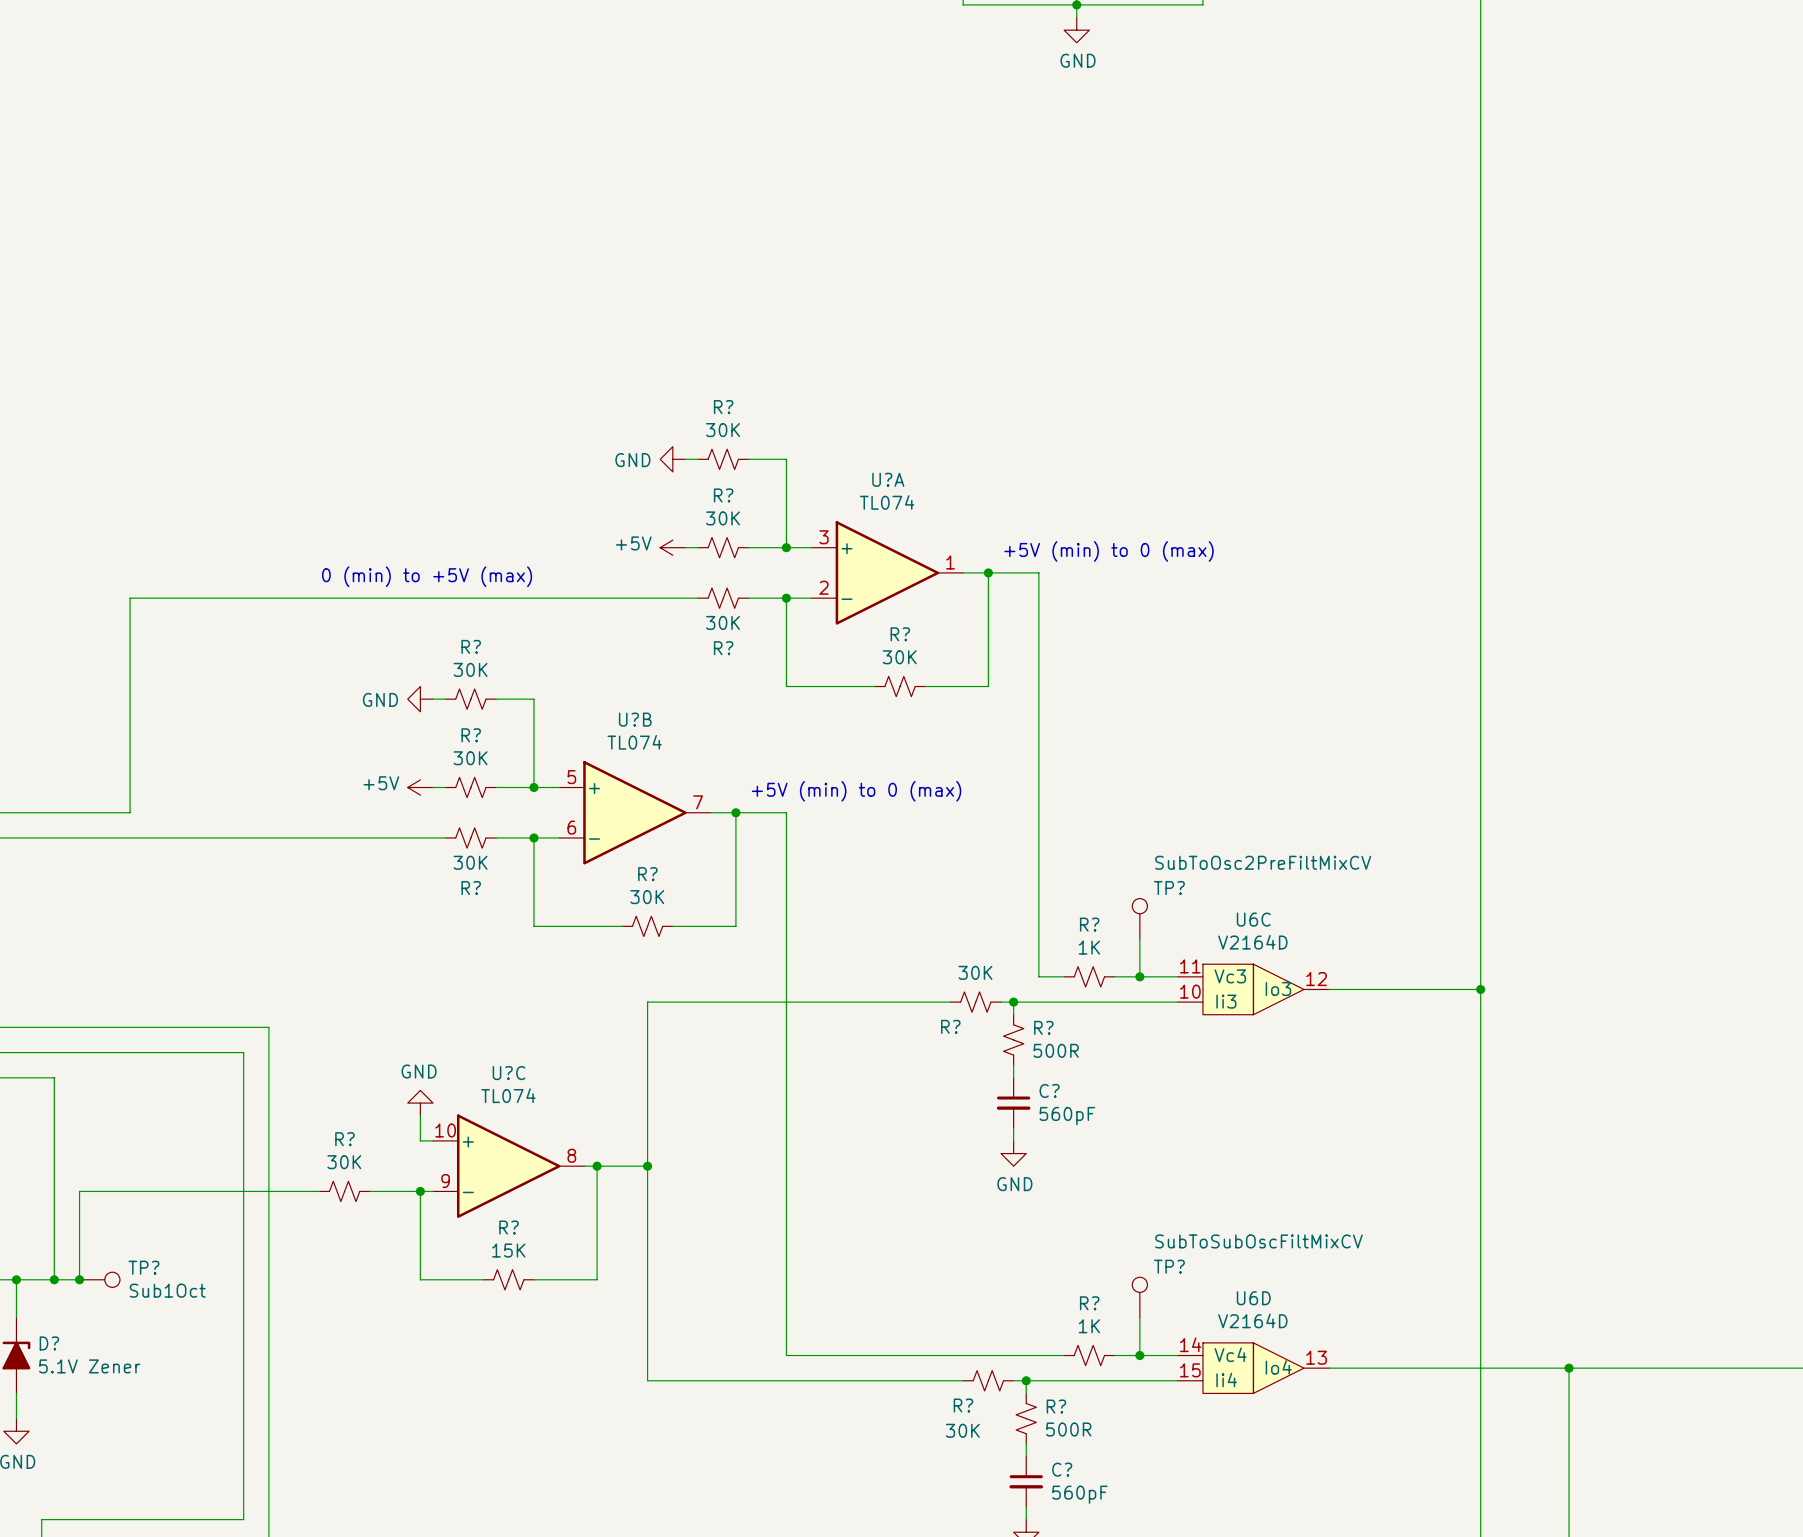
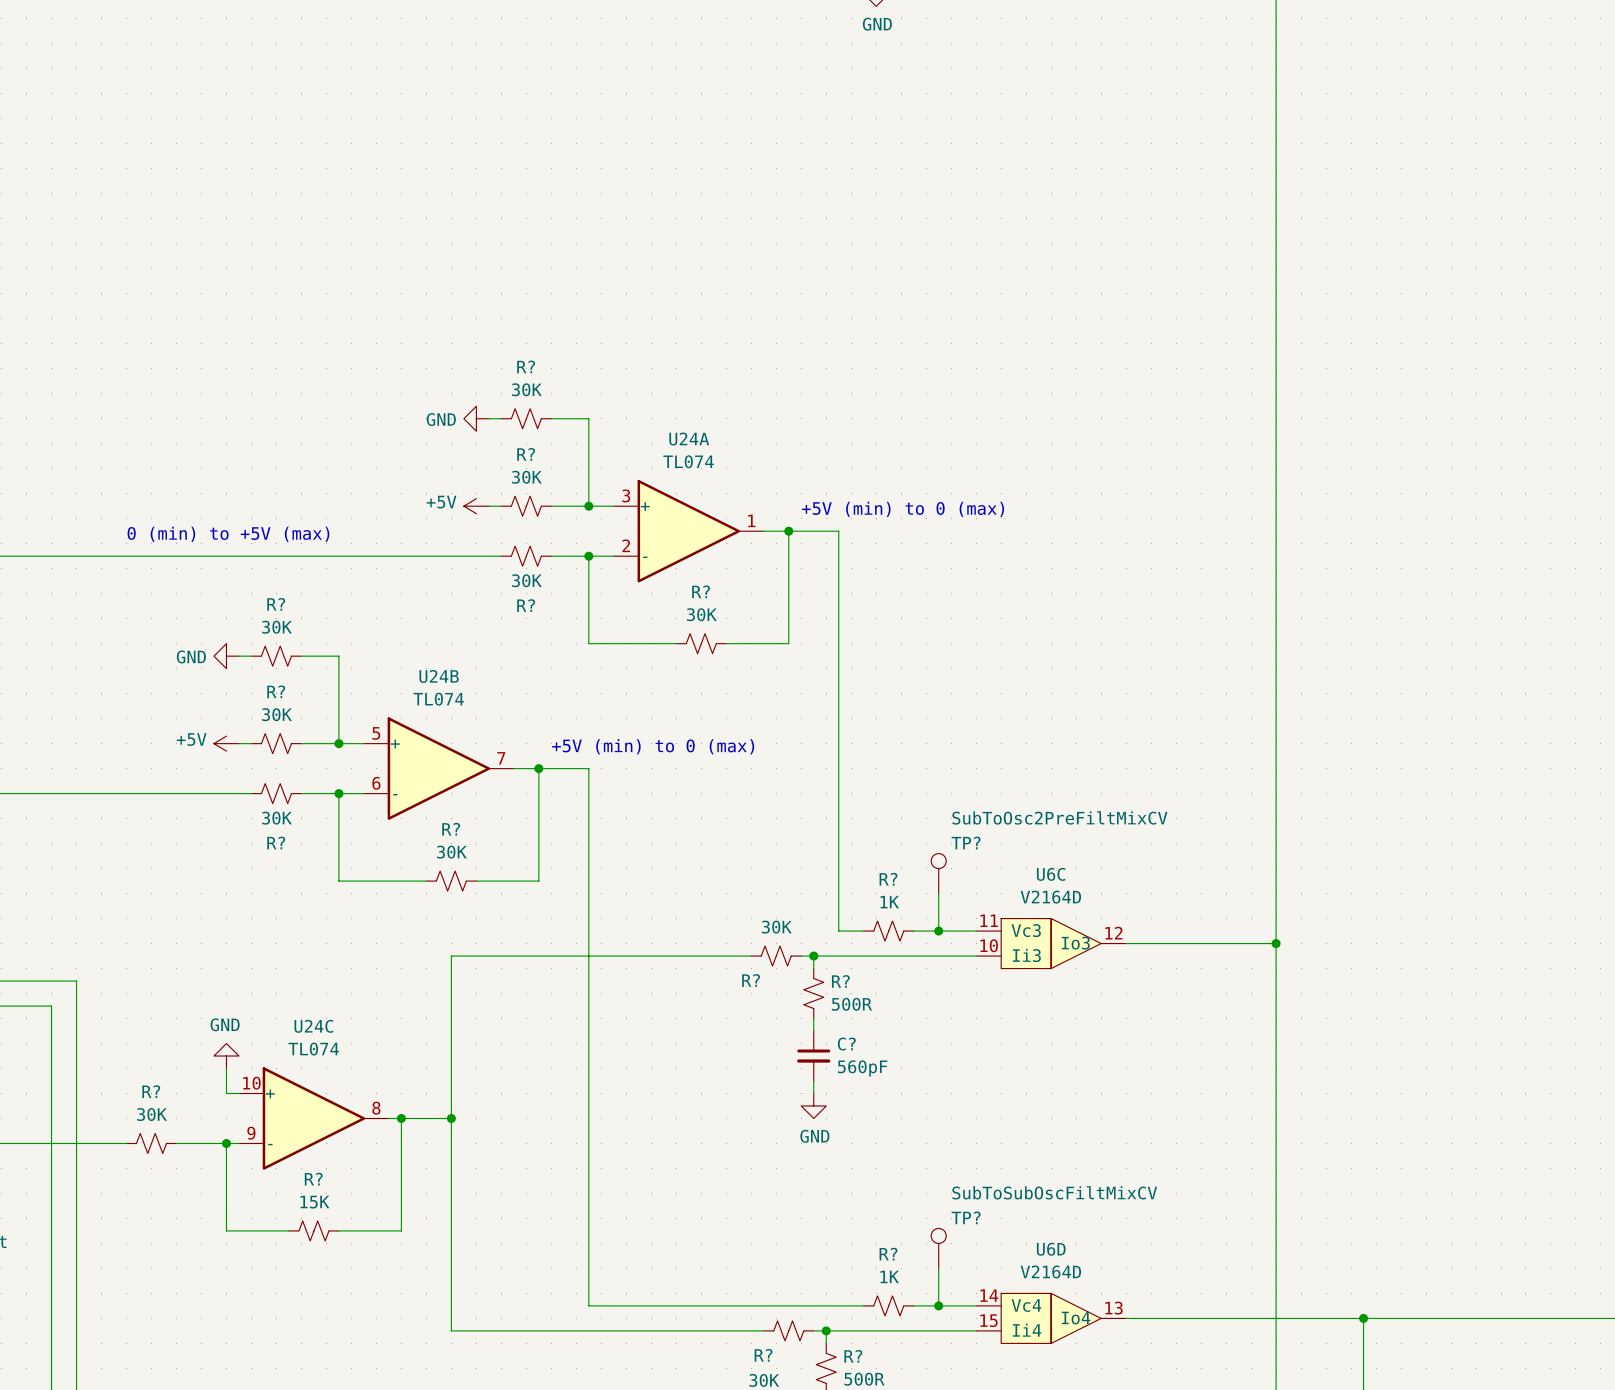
U?A name: U?A (888, 479) -> U24A (689, 439)
U?B name: U?B (635, 719) -> U24B (439, 676)
U?C name: U?C (509, 1073) -> U24C (313, 1026)

